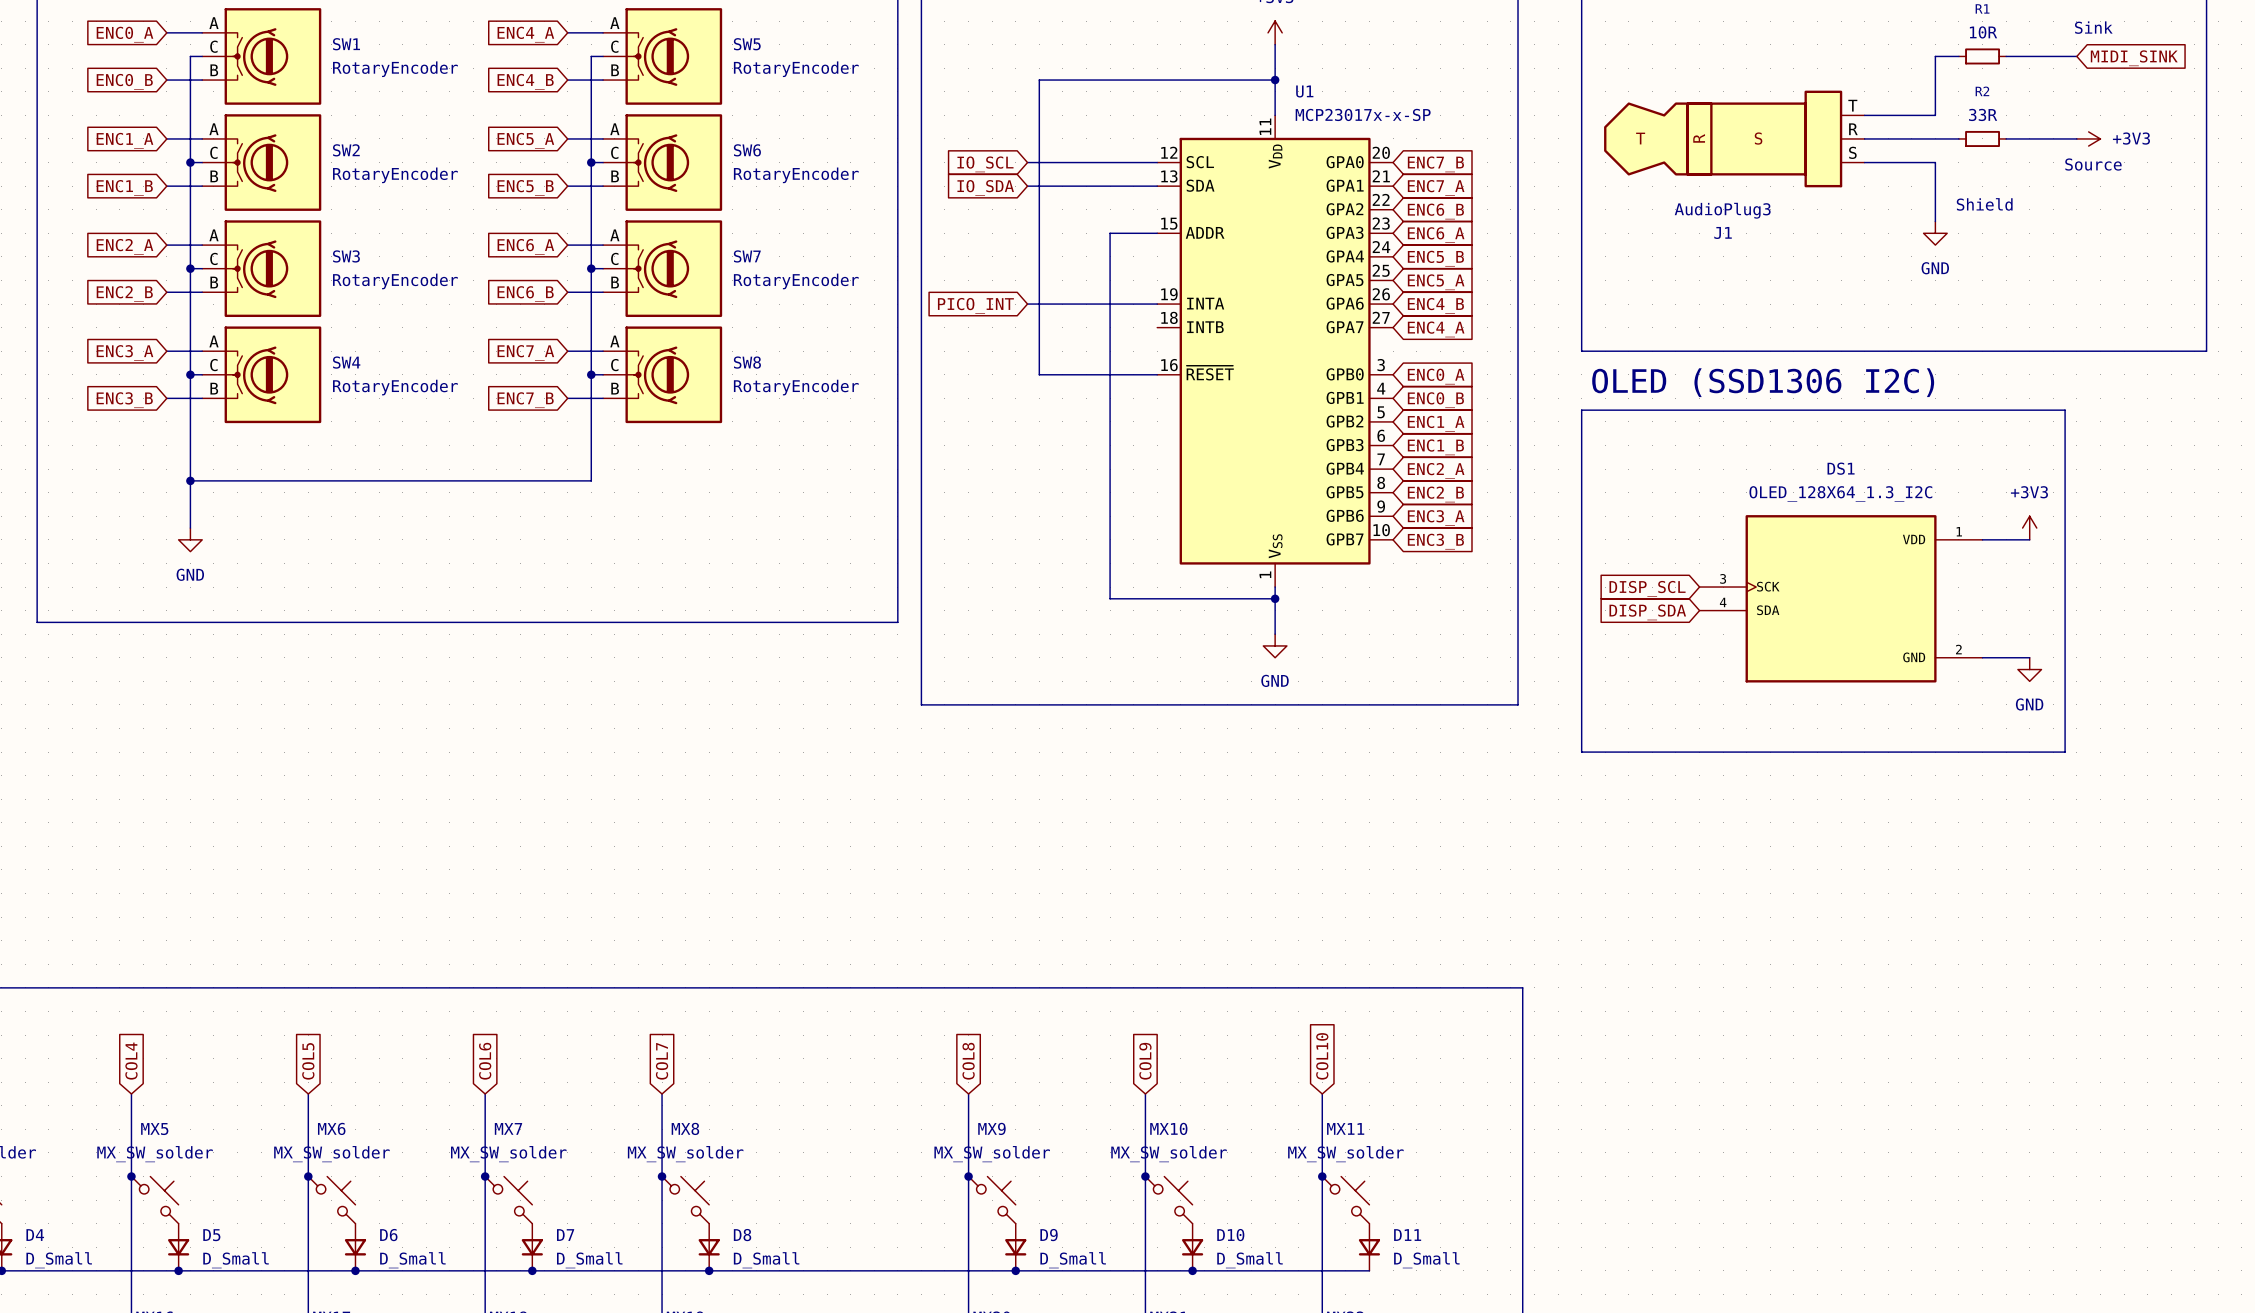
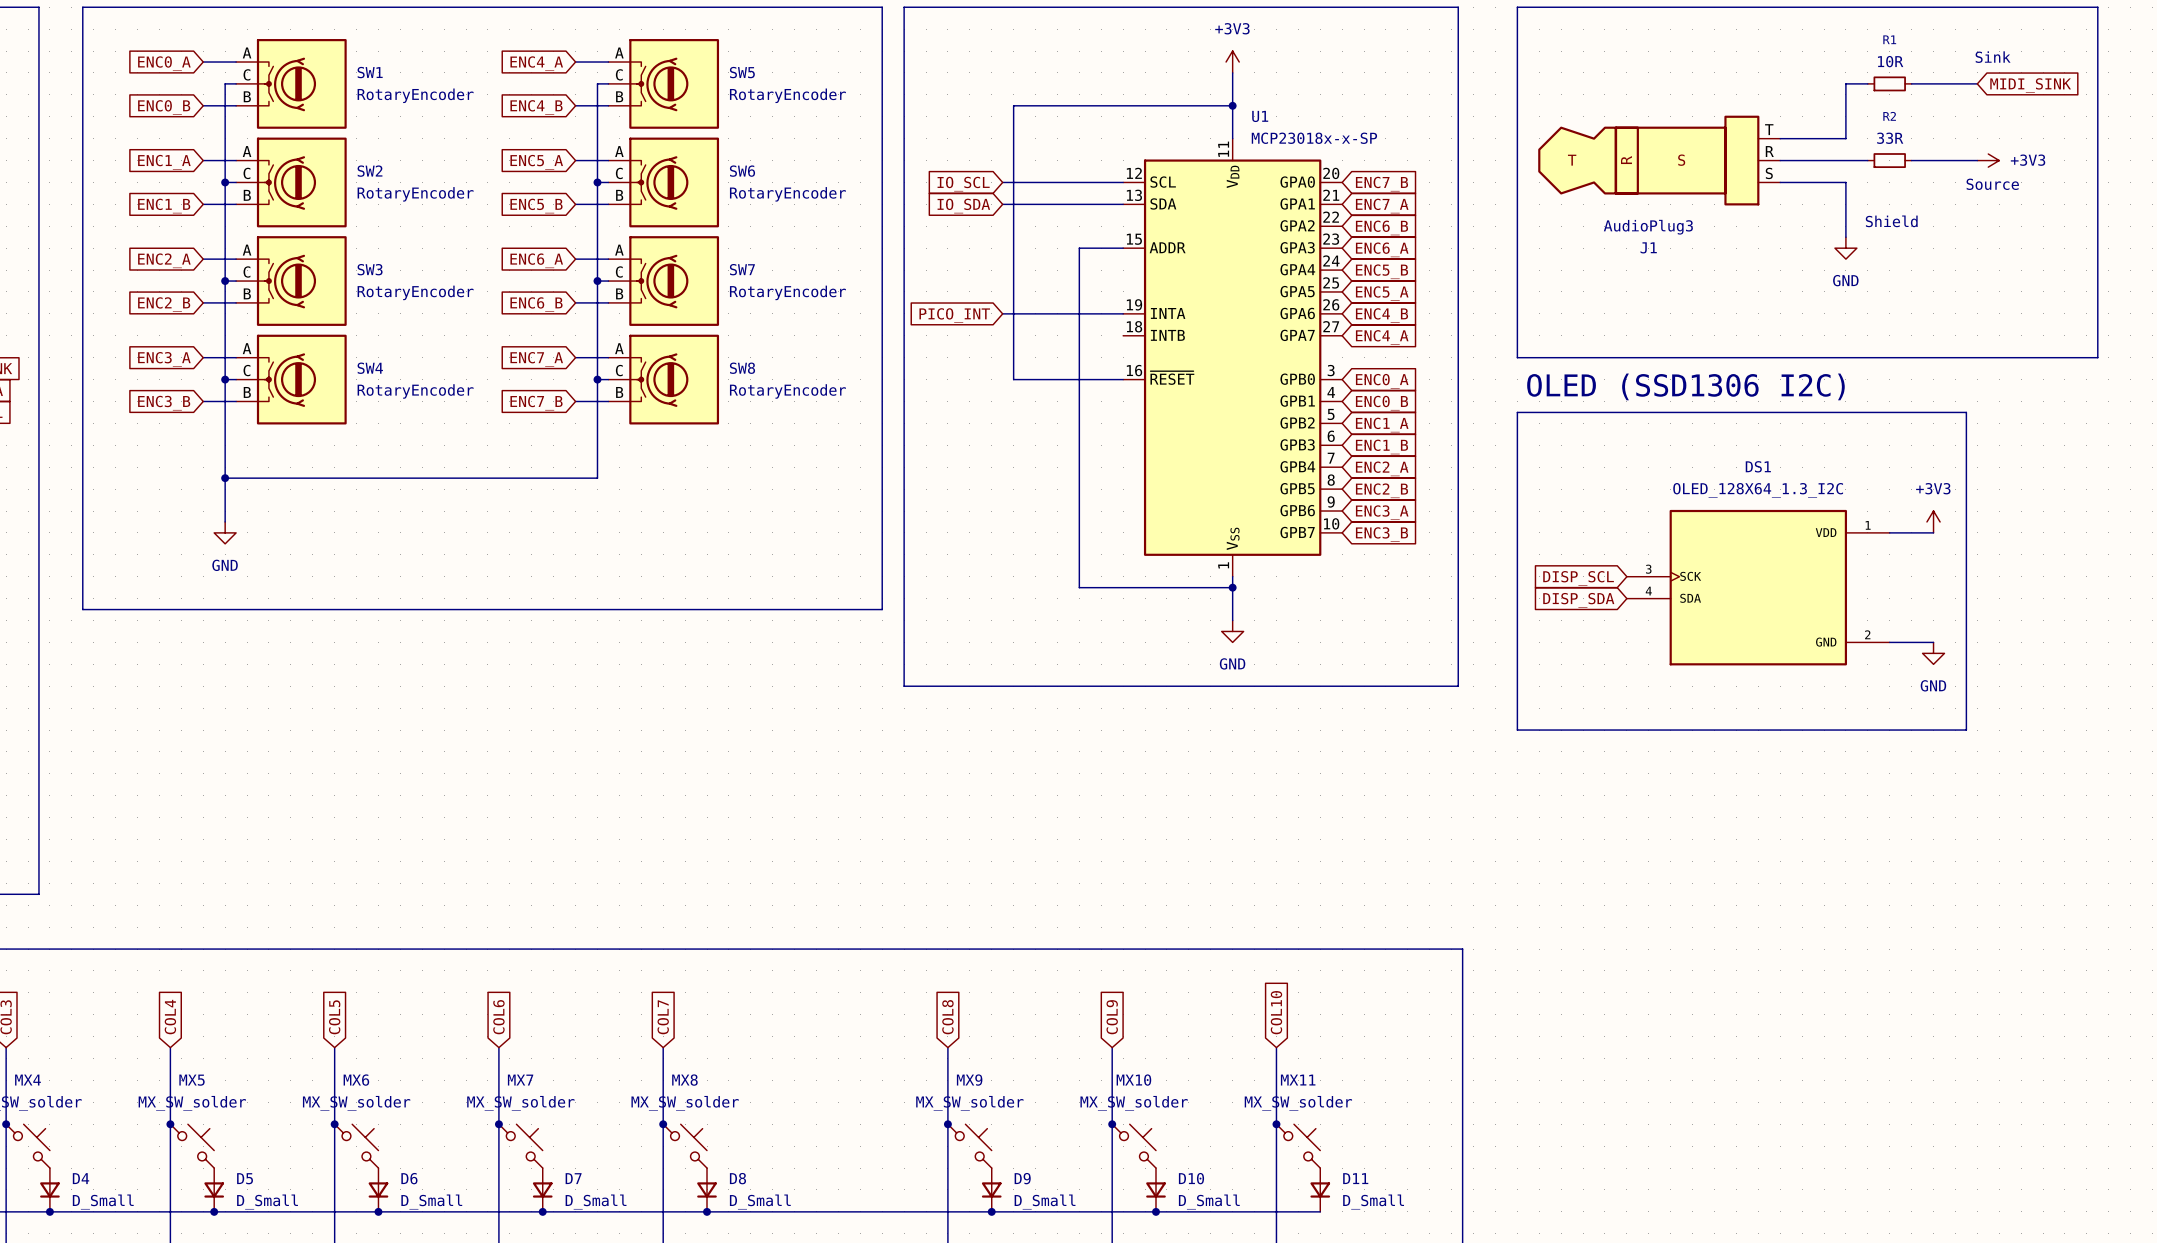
U1 value: MCP23017x-x-SP (1363, 114) -> MCP23018x-x-SP (1314, 138)

